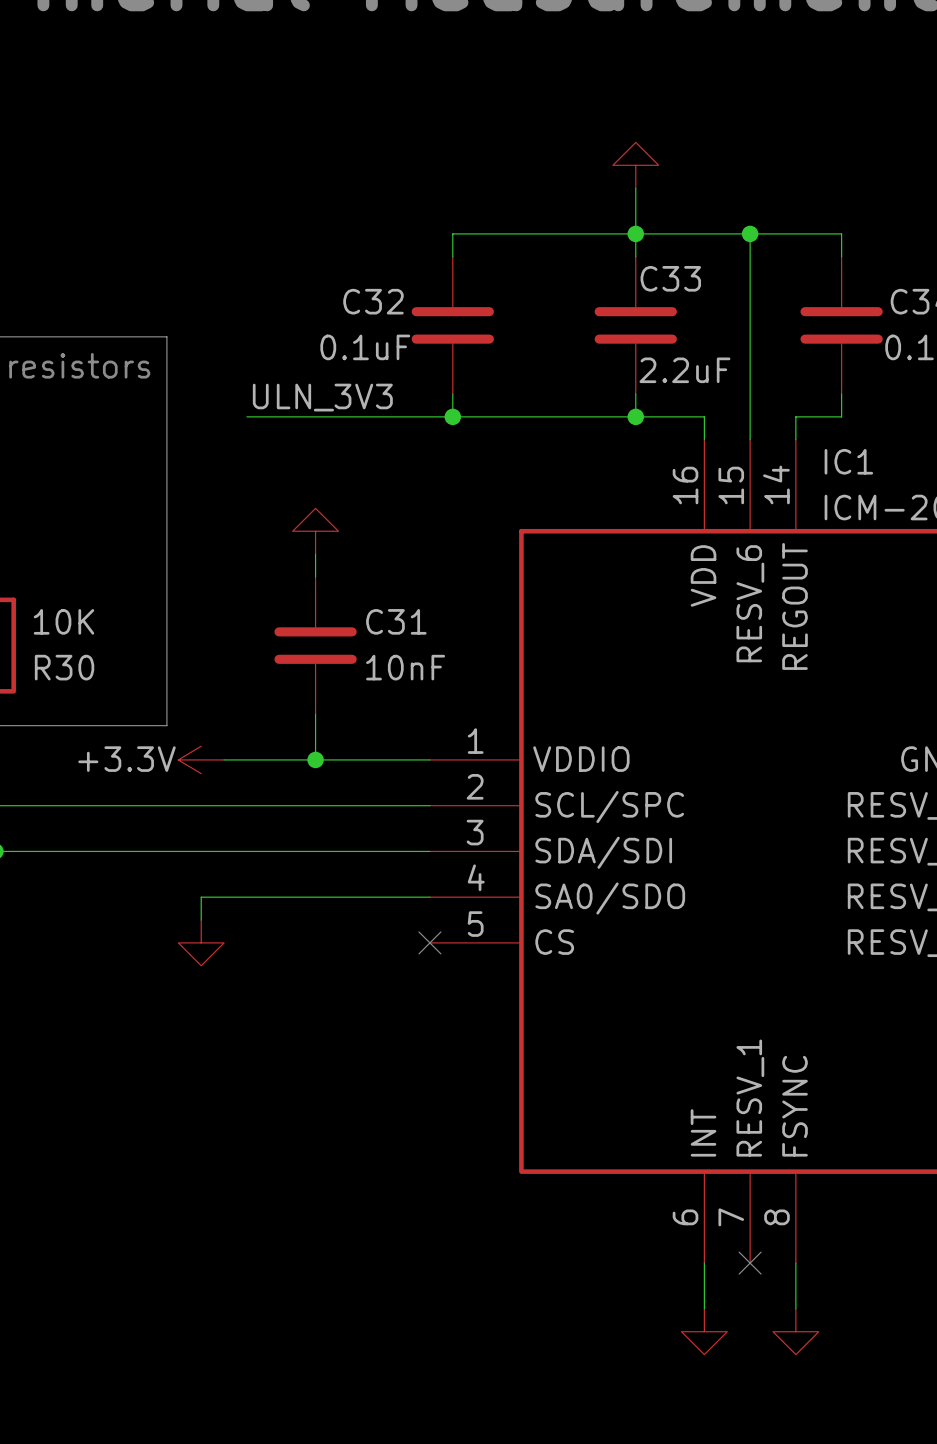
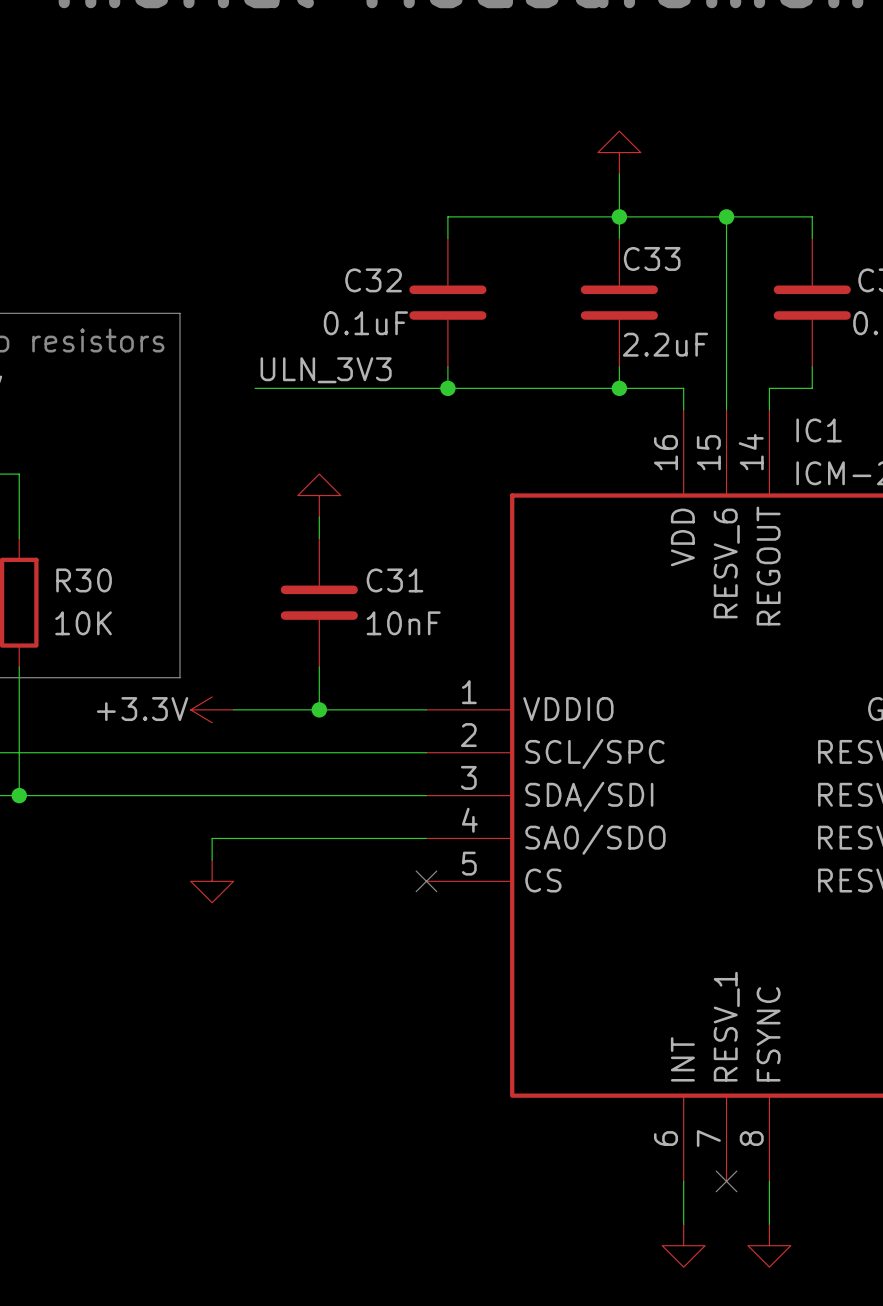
R30 value position: 10K (63, 621) -> 10K (83, 623)
R30 name position: R30 (64, 667) -> R30 (84, 580)

